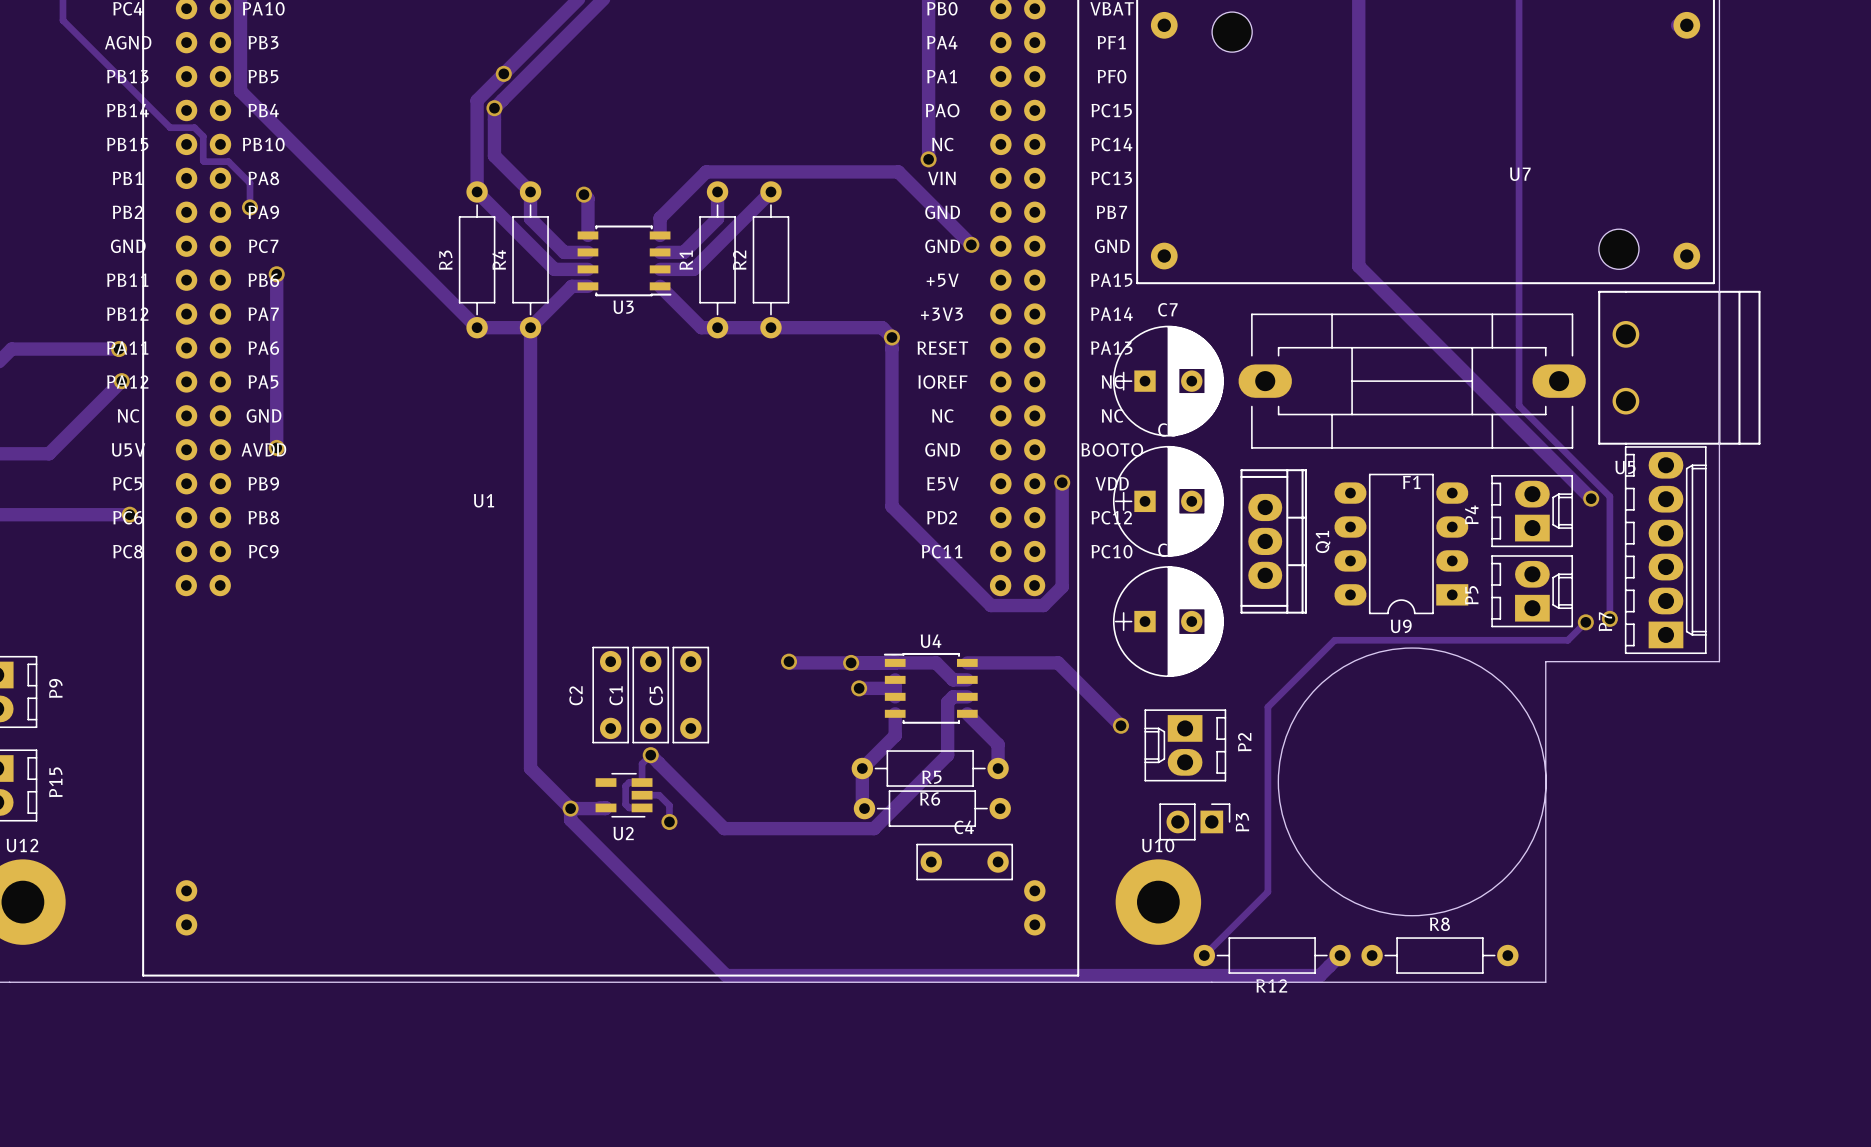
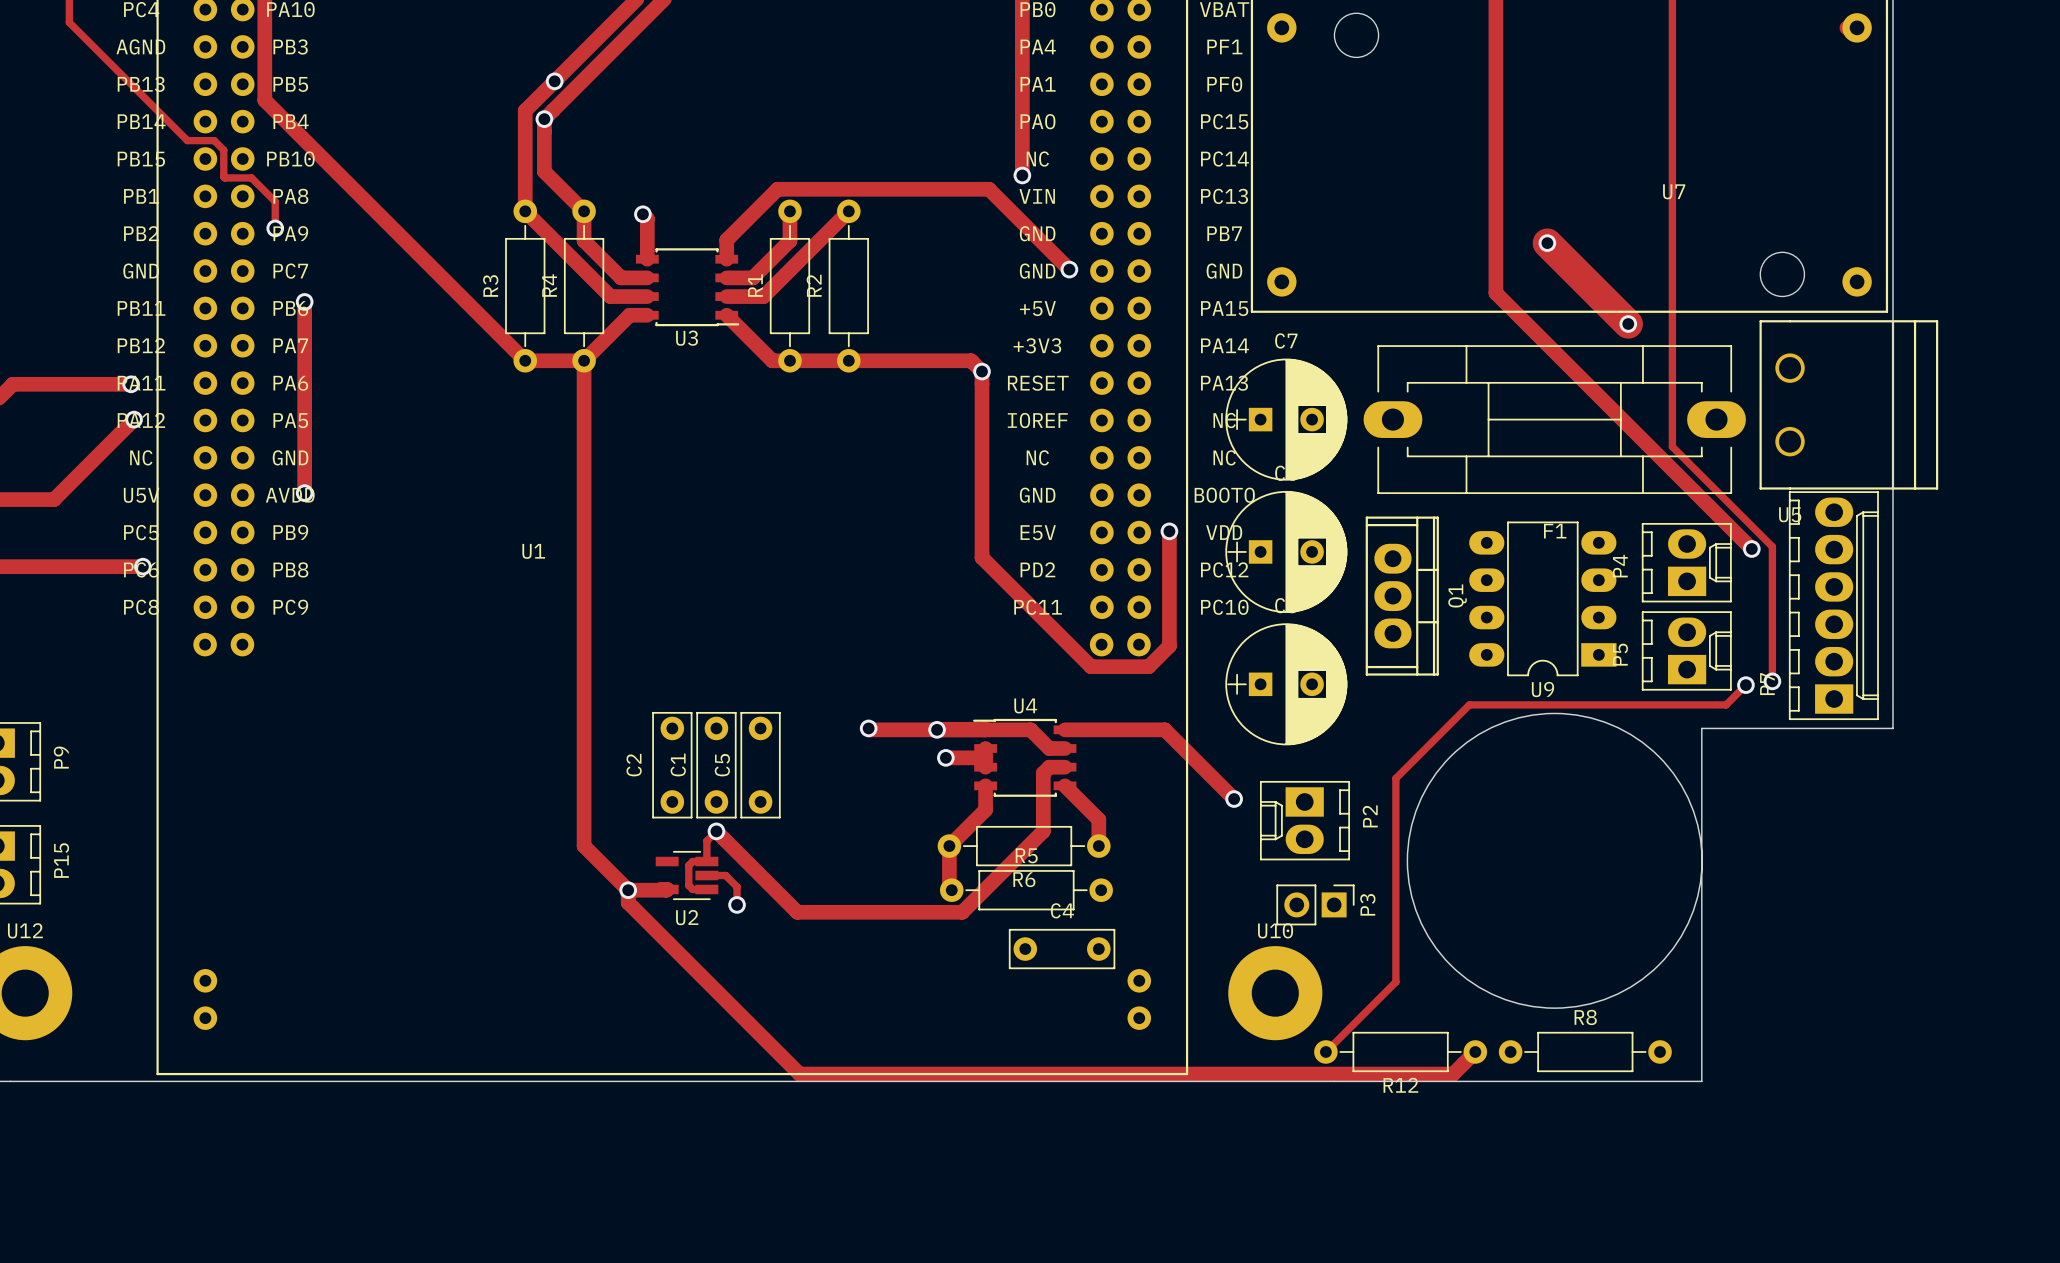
track: none -> (1547, 243) (1628, 324)
via: none -> (1547, 243)
via: none -> (1628, 324)

